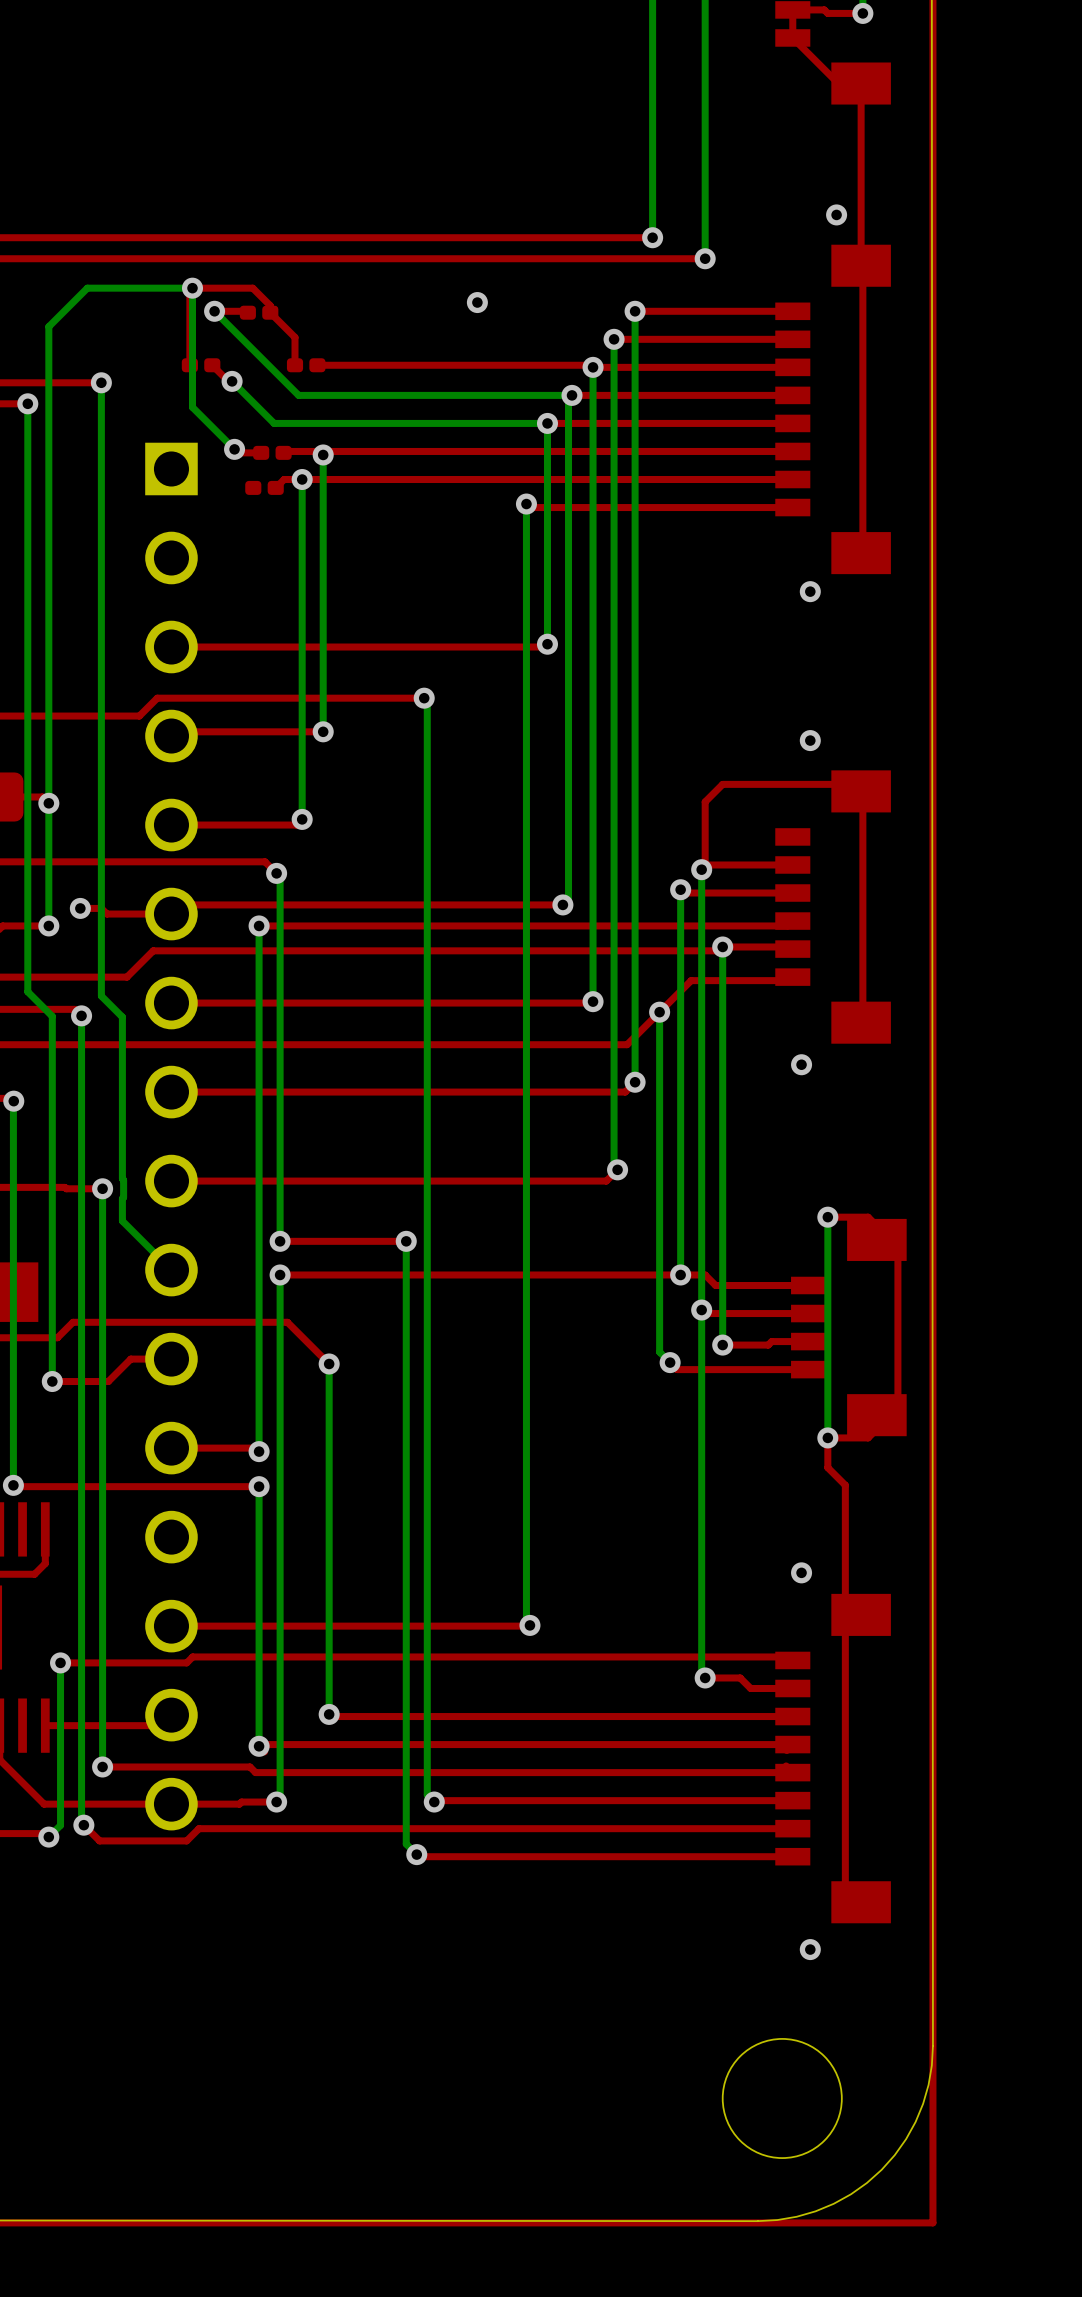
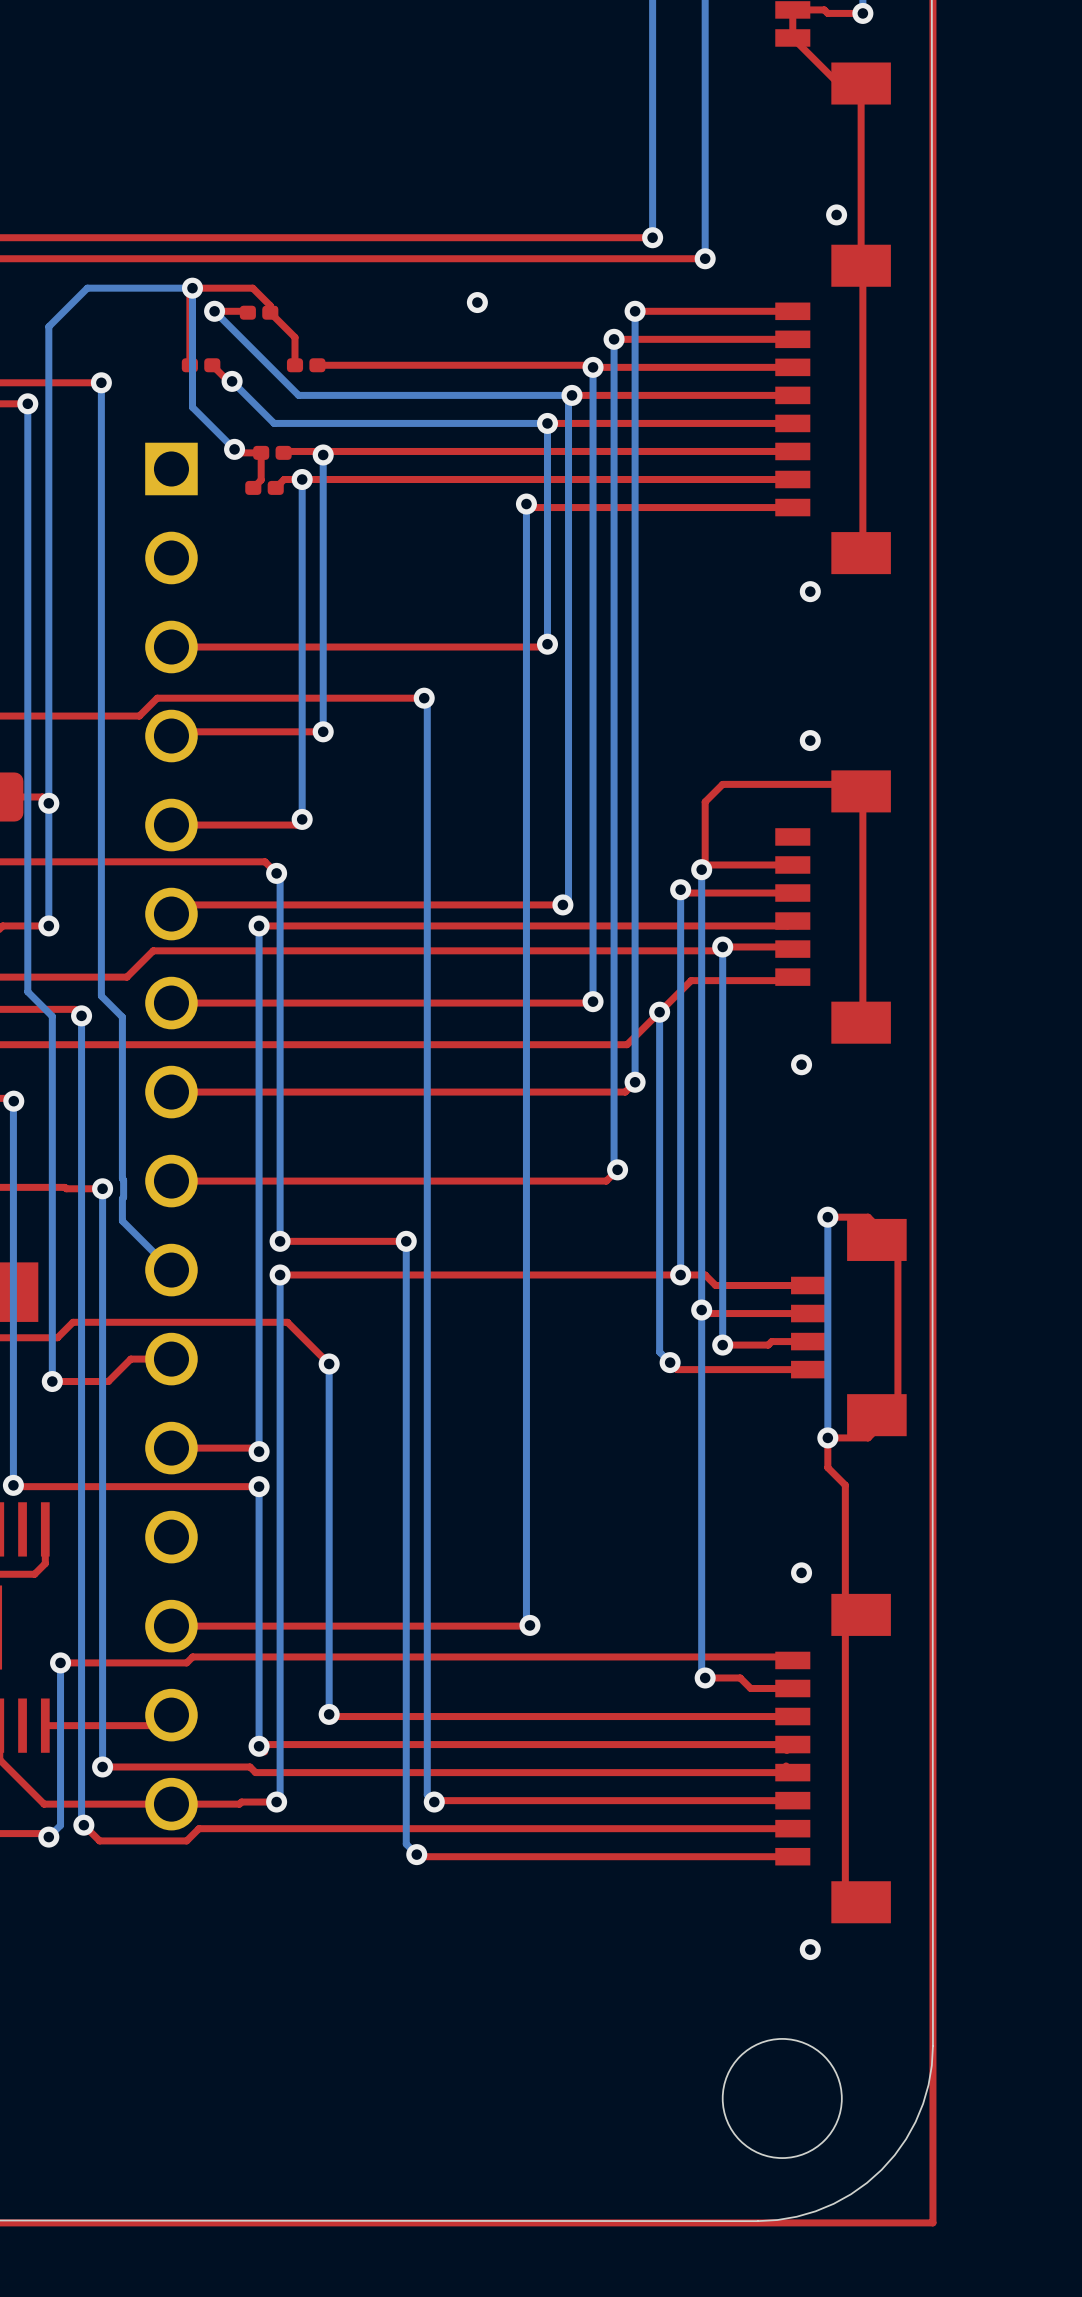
top track: none -> (261, 452) (261, 480) (253, 487)
top track: (80, 908) (101, 908) (106, 914) (171, 914) -> none
via: (80, 908) -> none

